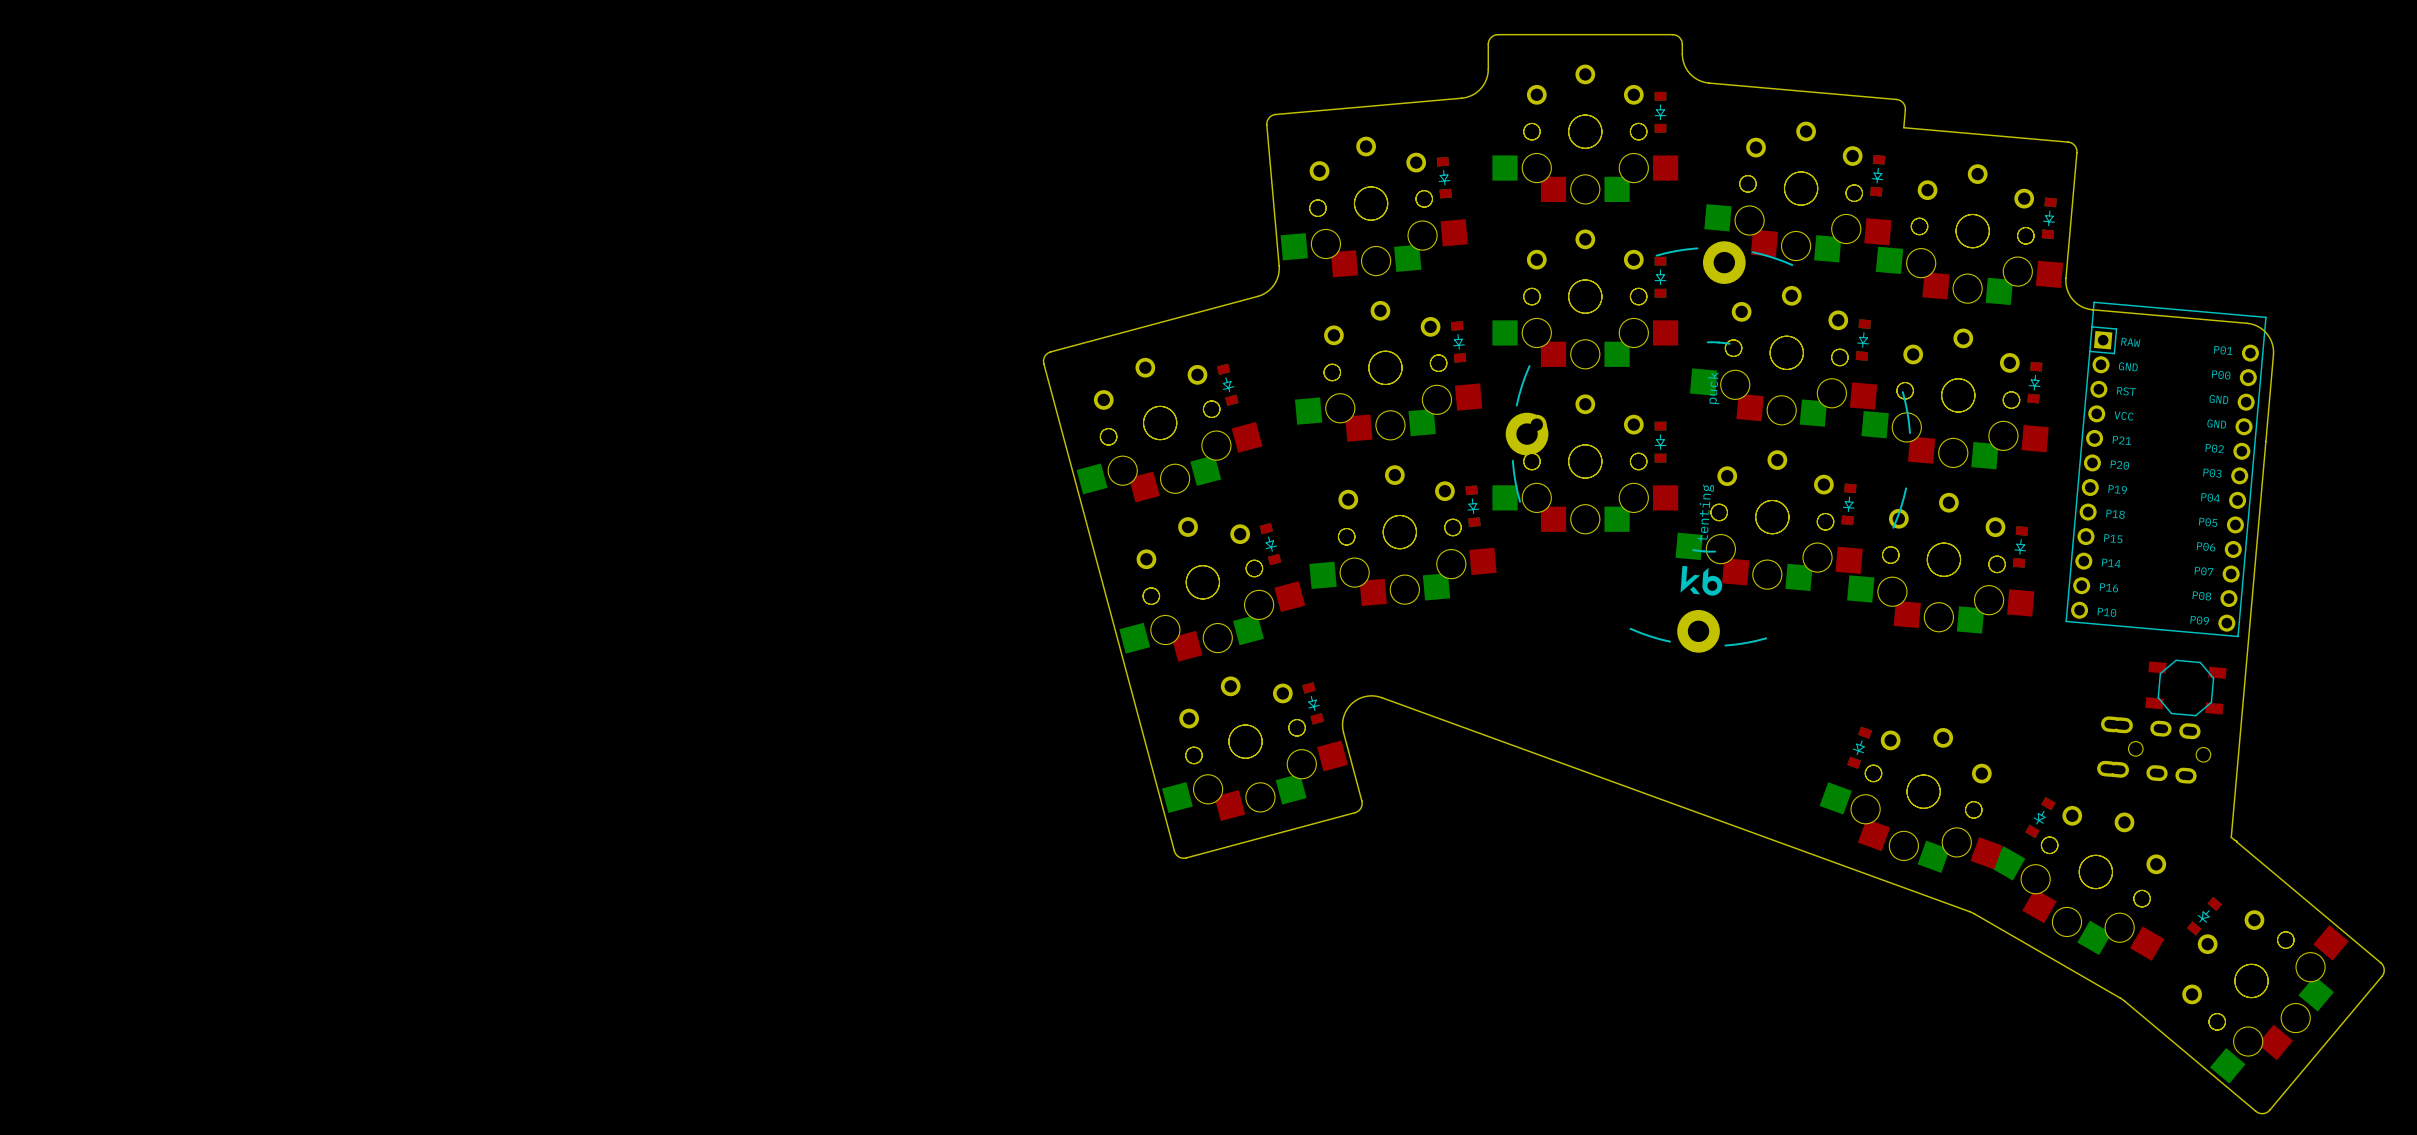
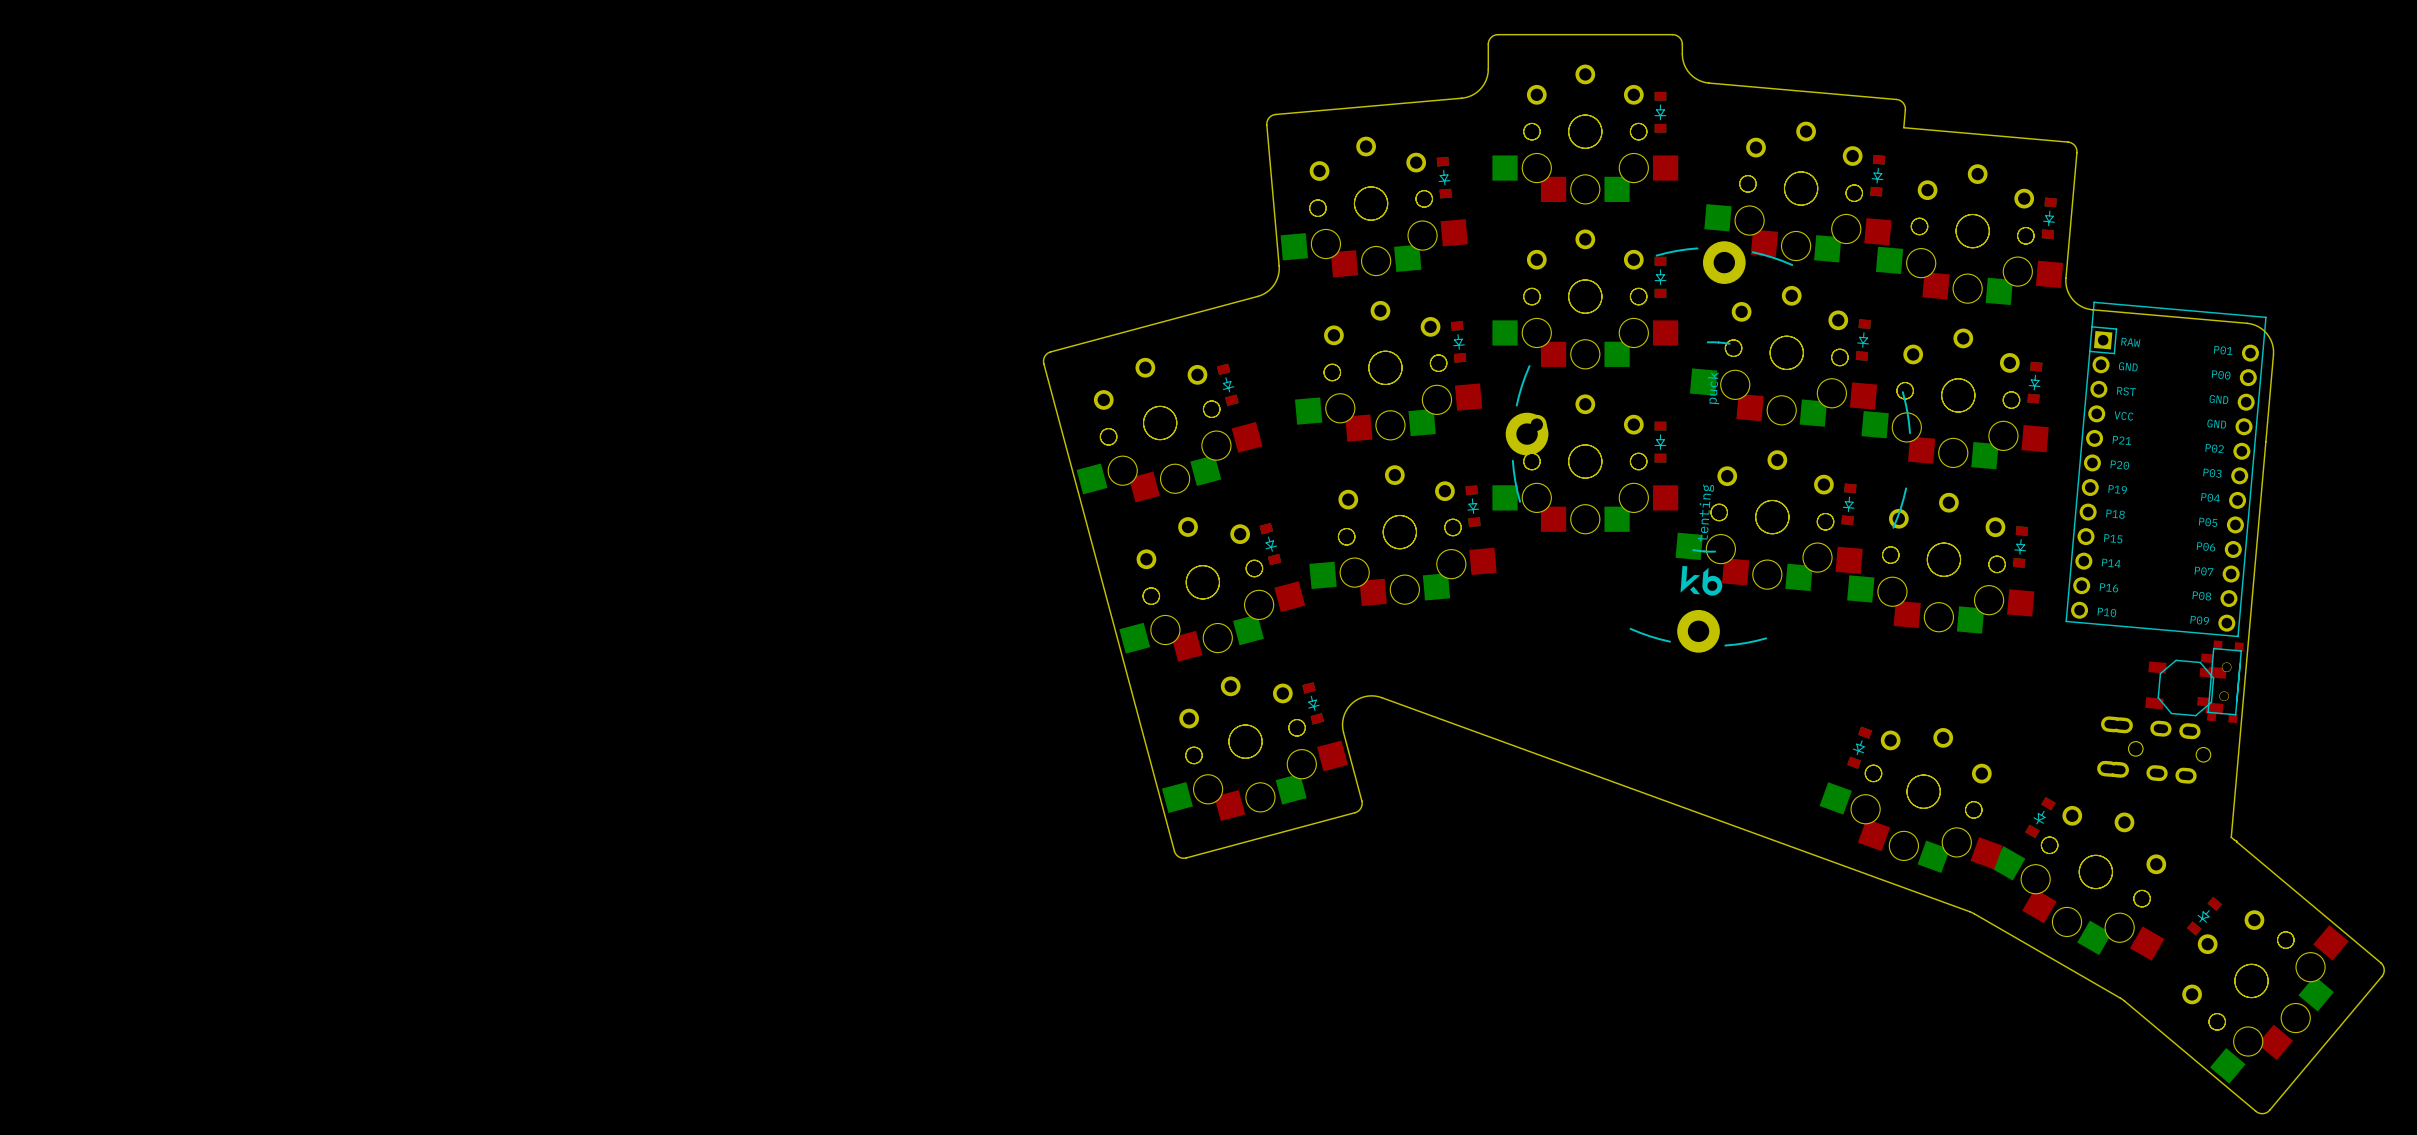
part: none -> (2220, 681)

